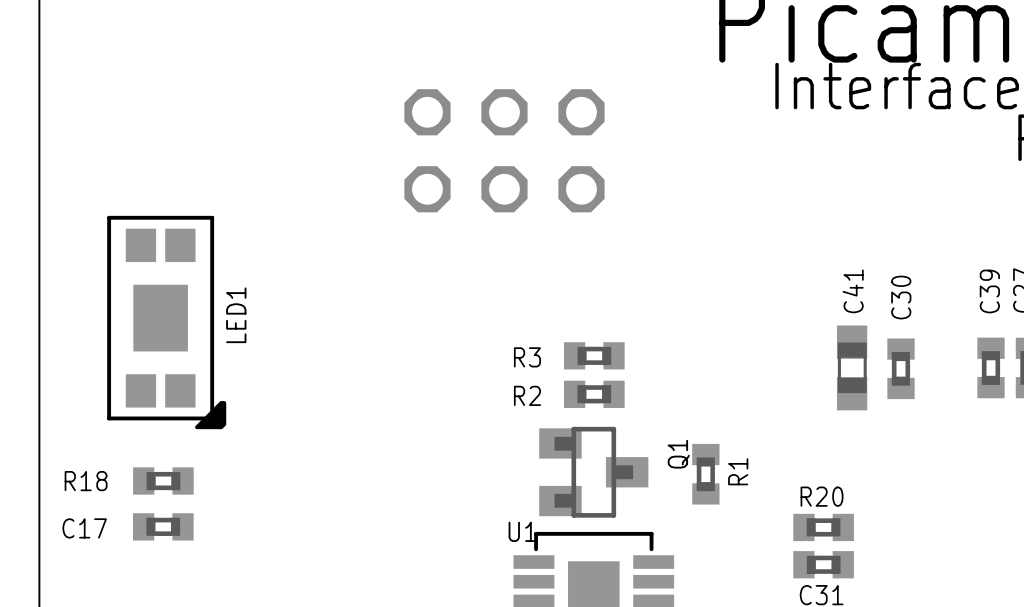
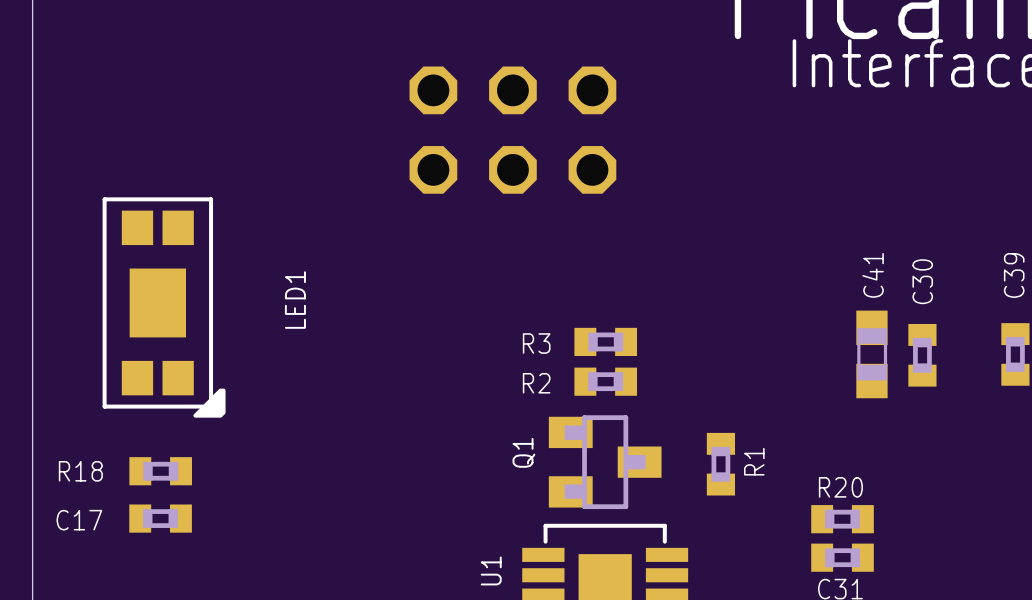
LED1 name position: LED1 (236, 315) -> LED1 (295, 300)
Q1 name position: Q1 (678, 454) -> Q1 (523, 452)
U1 name rotation: 0° (522, 531) -> 90° counterclockwise (491, 570)
U1 name position: U1 (522, 531) -> U1 (491, 570)

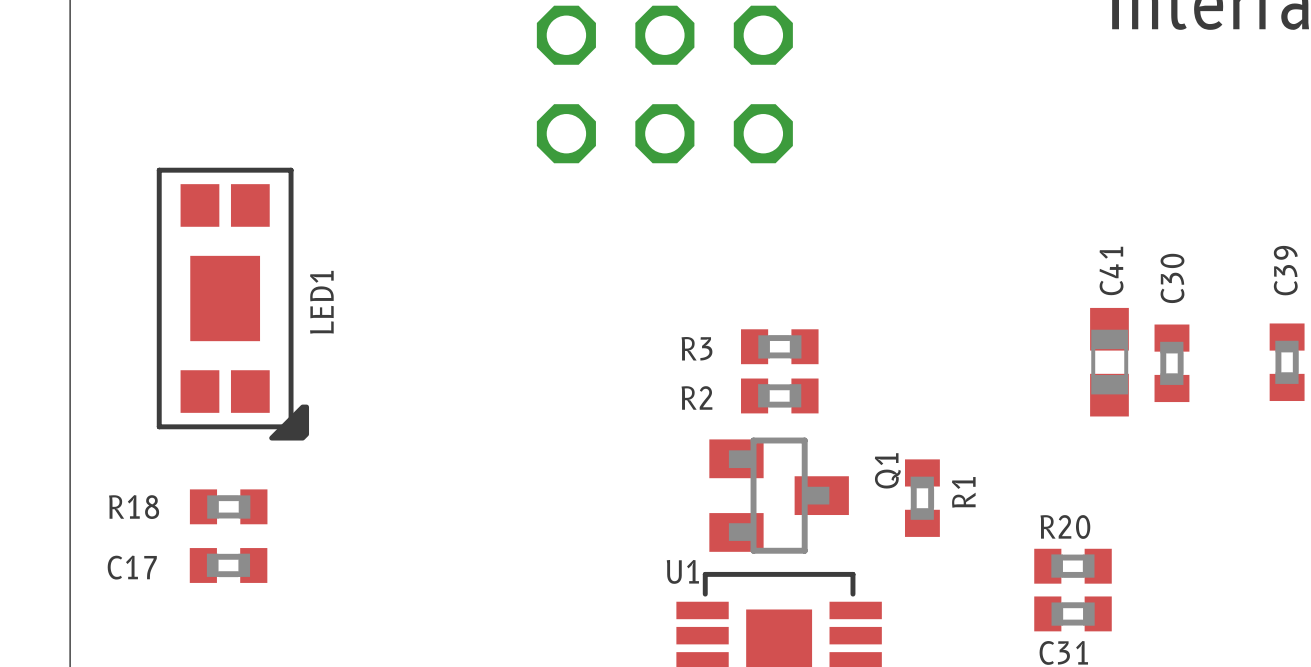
LED1 name position: LED1 (295, 300) -> LED1 (321, 302)
Q1 name position: Q1 (523, 452) -> Q1 (887, 470)
U1 name rotation: 0° (491, 570) -> 90° clockwise (682, 571)
U1 name position: U1 (491, 570) -> U1 (682, 571)

